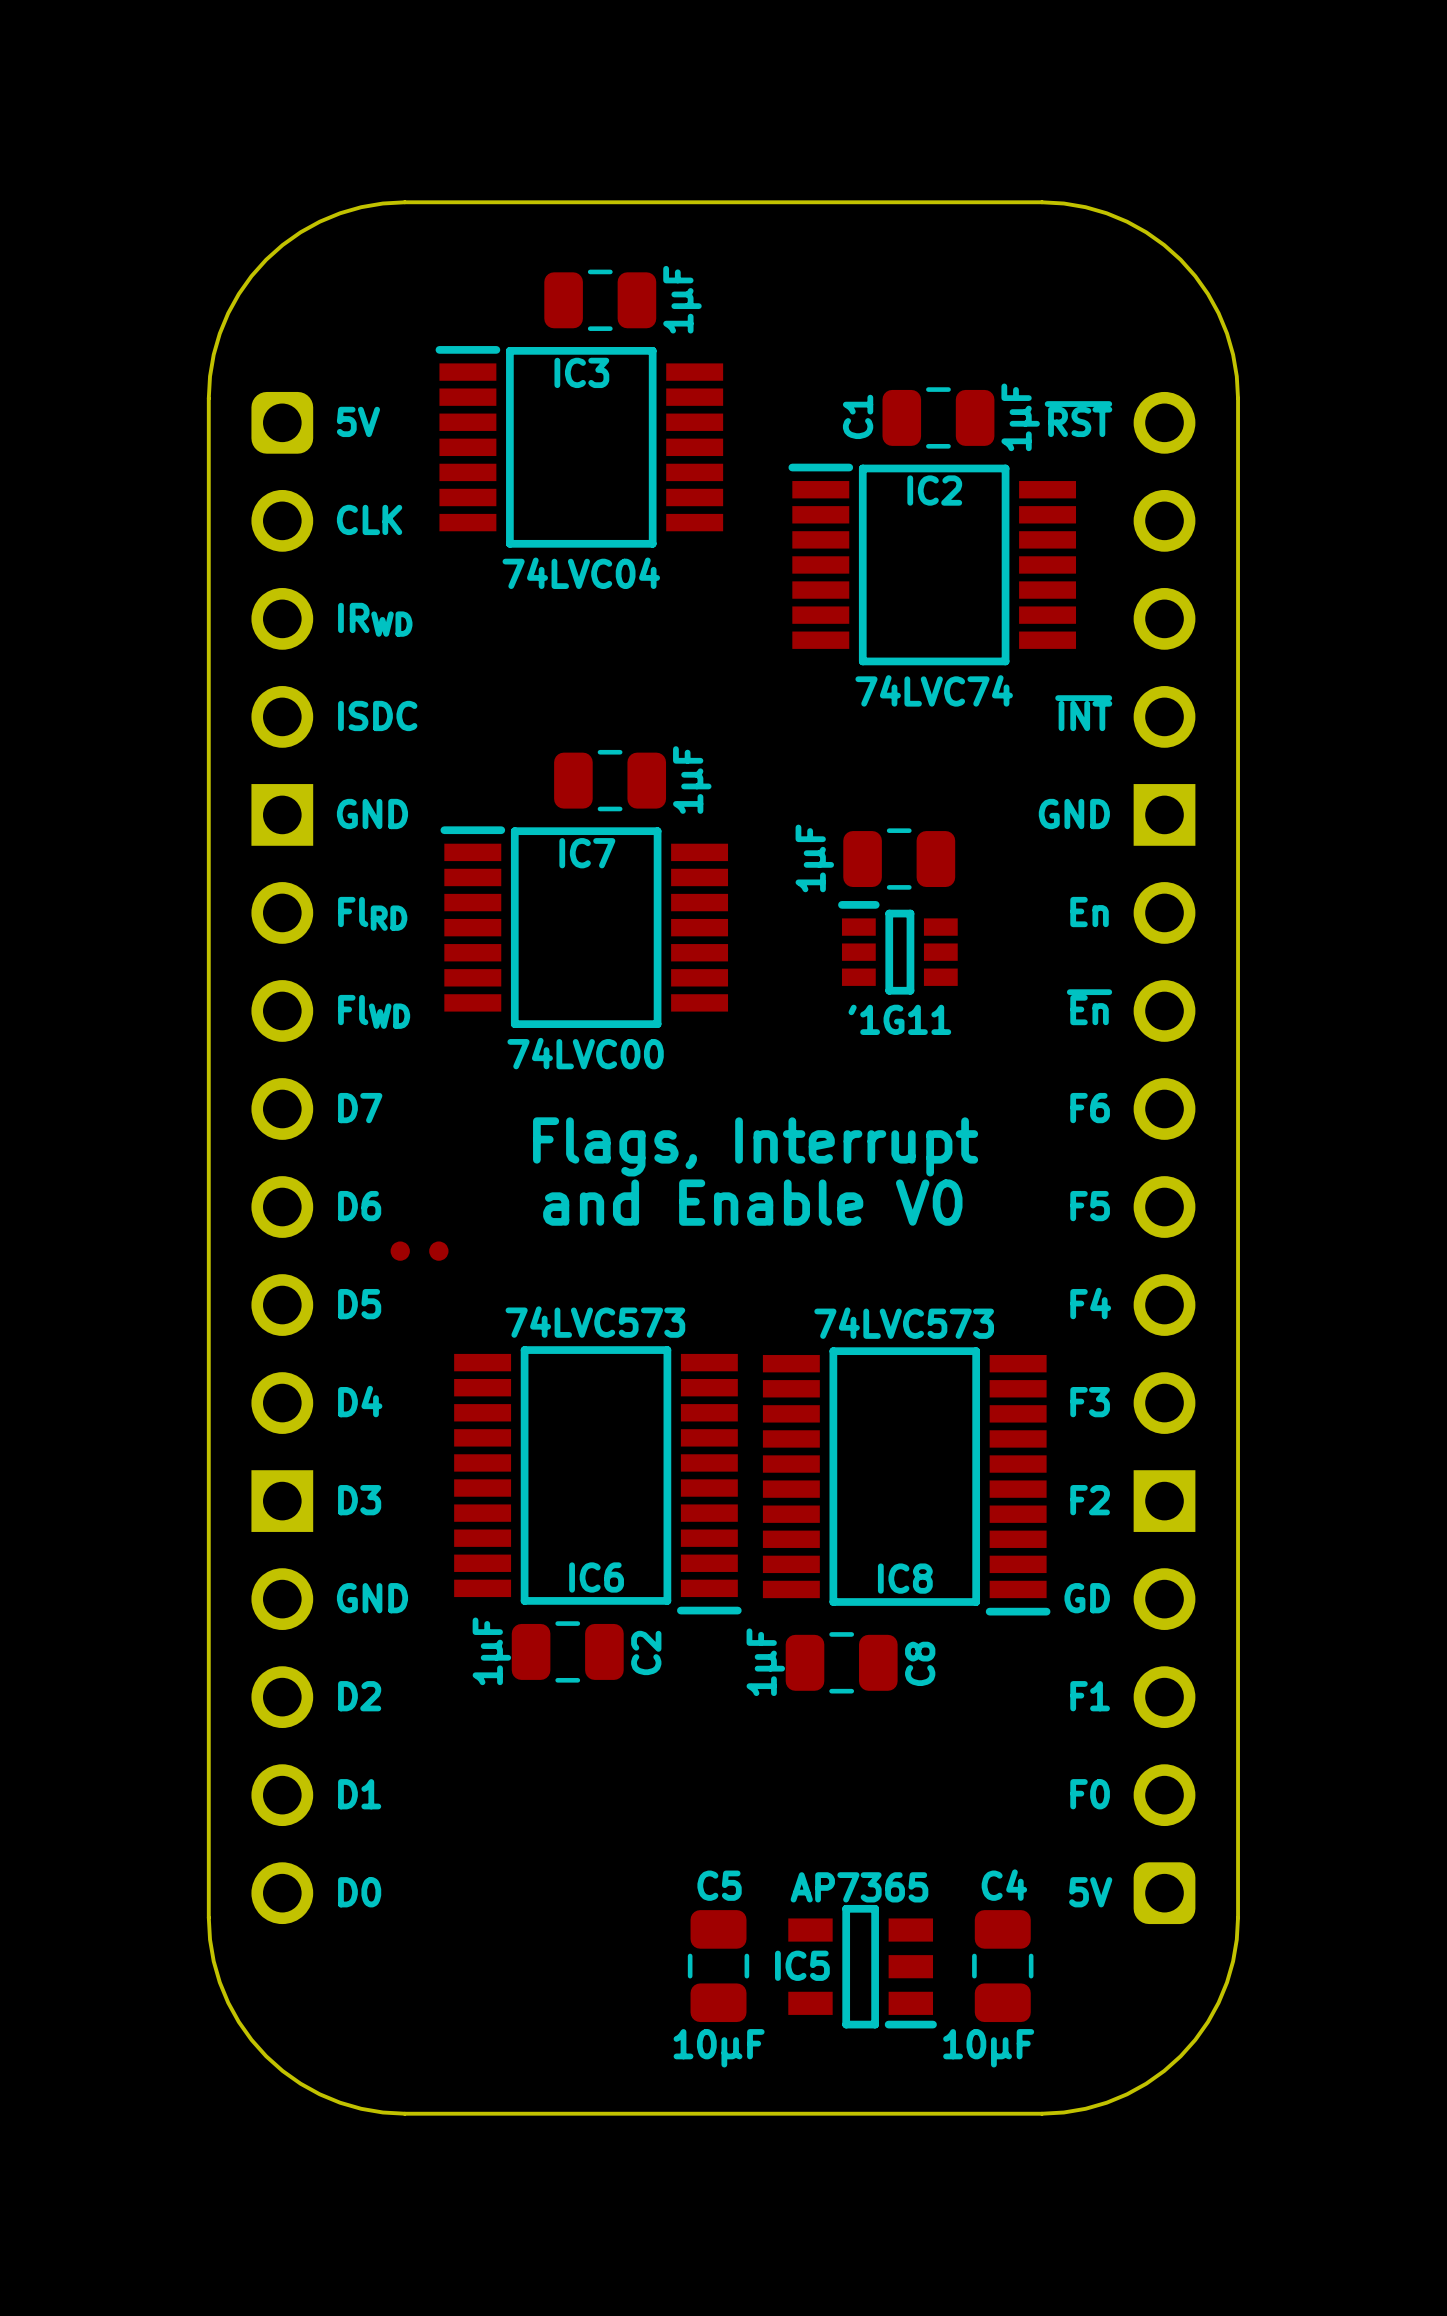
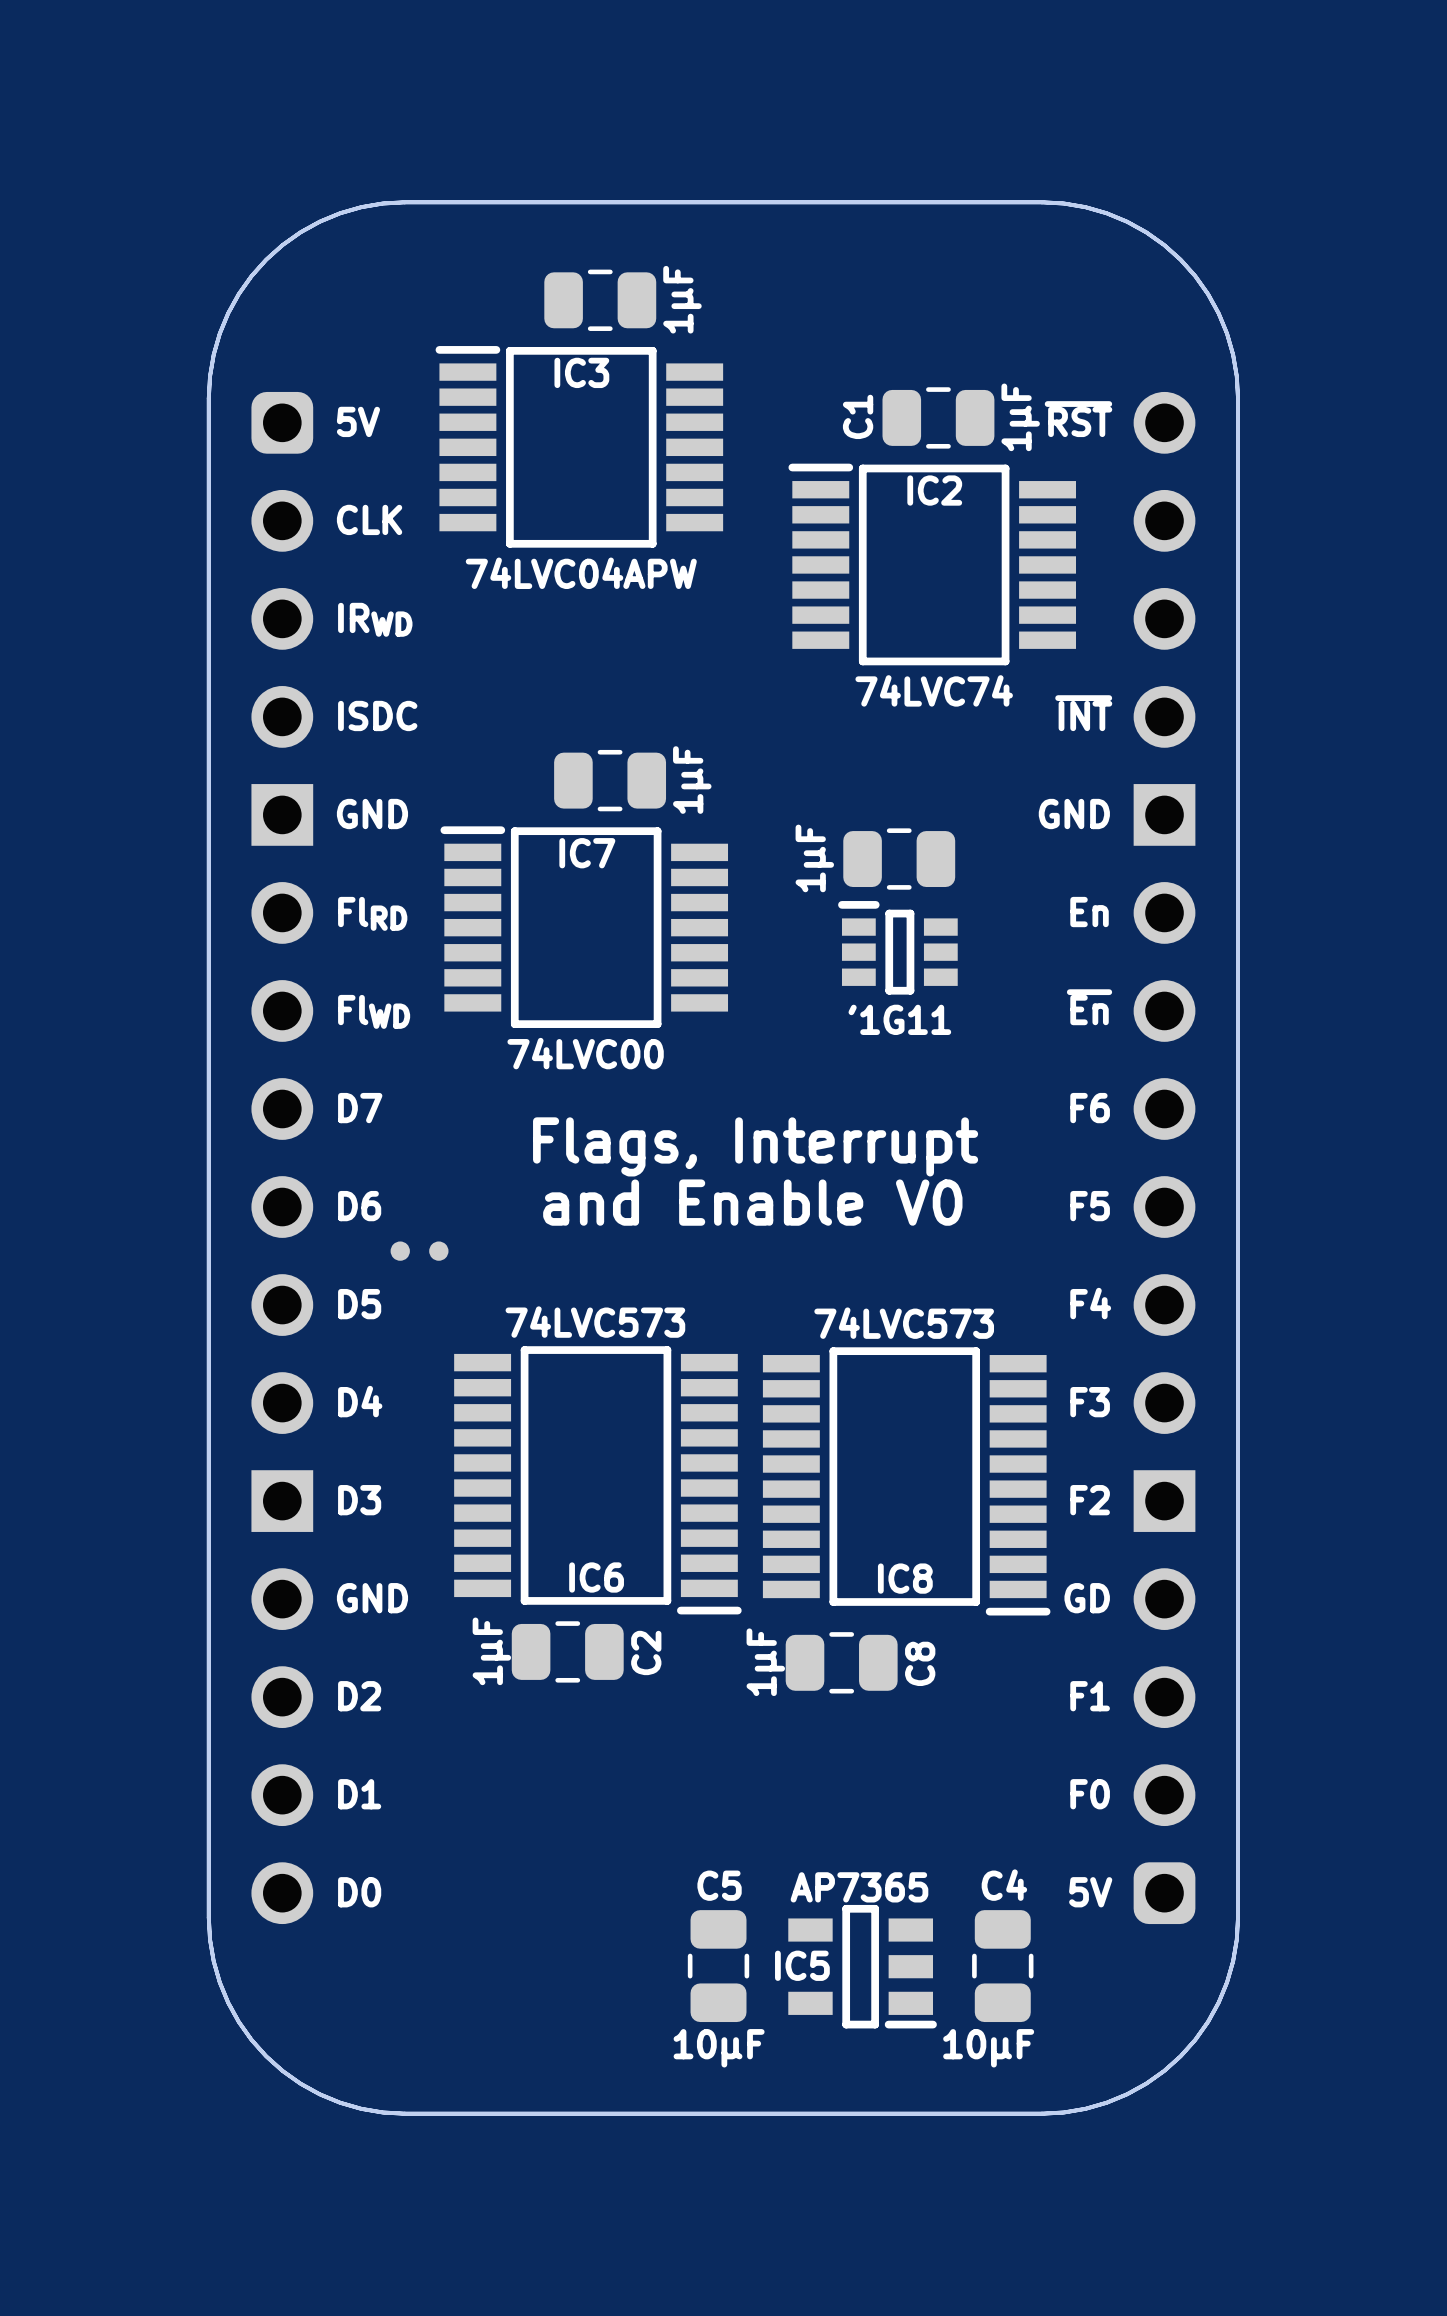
board edge: none -> (404, 202) (1063, 203) (1085, 207) (1127, 221) (1164, 245) (1180, 259) (1207, 294) (1227, 333) (1233, 354) (1238, 398) (1236, 1939) (1227, 1982) (1218, 2002) (1195, 2039) (1164, 2070) (1127, 2094) (1106, 2102) (1085, 2108) (1041, 2113) (382, 2112) (340, 2102) (300, 2083) (282, 2070) (266, 2056) (238, 2021) (219, 1982) (210, 1939) (208, 1917) (210, 376) (213, 354) (228, 313) (238, 294) (266, 259) (282, 245) (319, 221) (361, 207) (404, 202)
IC3 text: 74LVC04 (581, 573) -> 74LVC04APW (581, 573)

